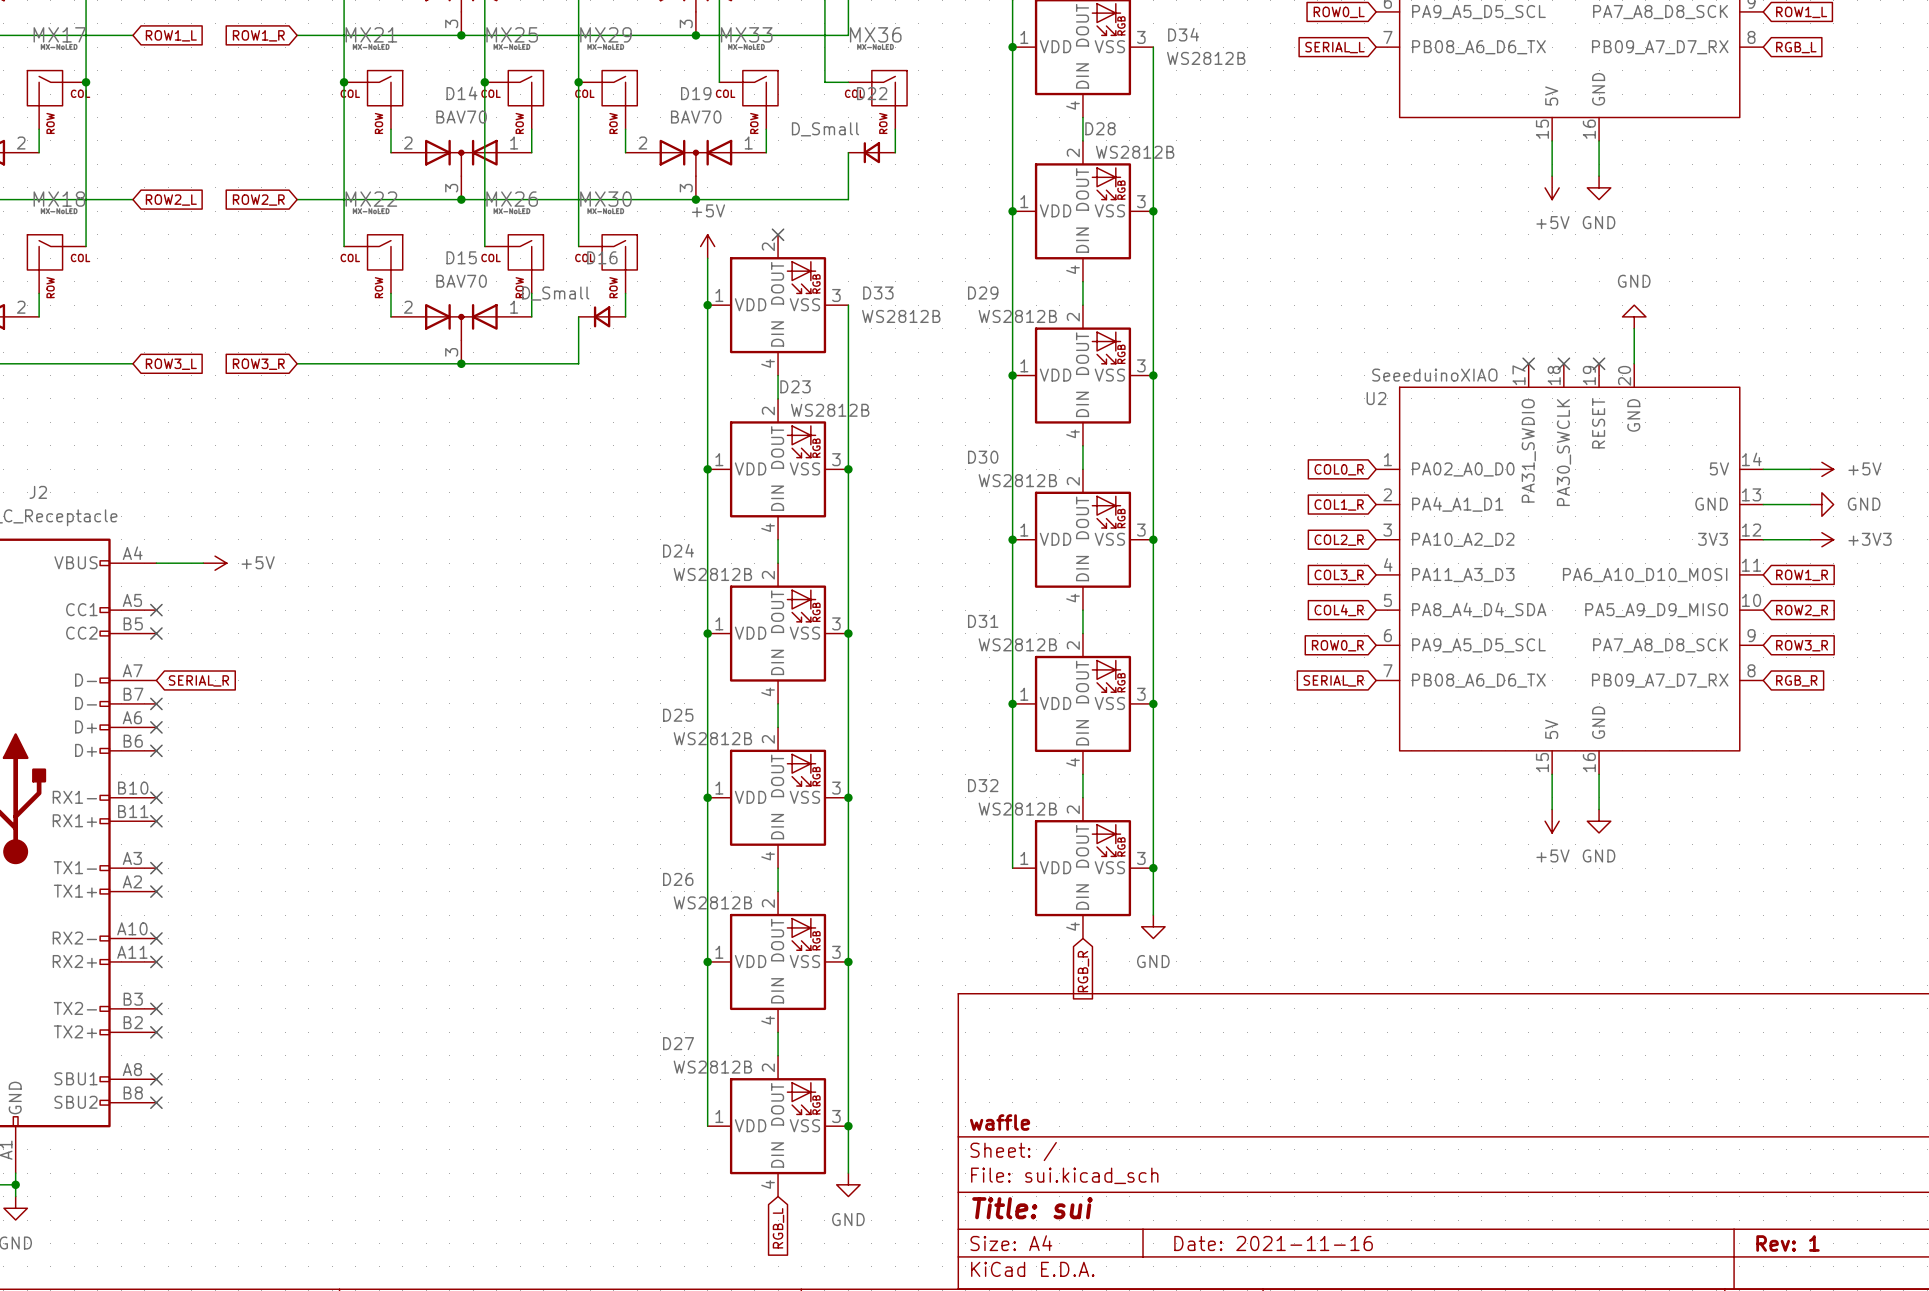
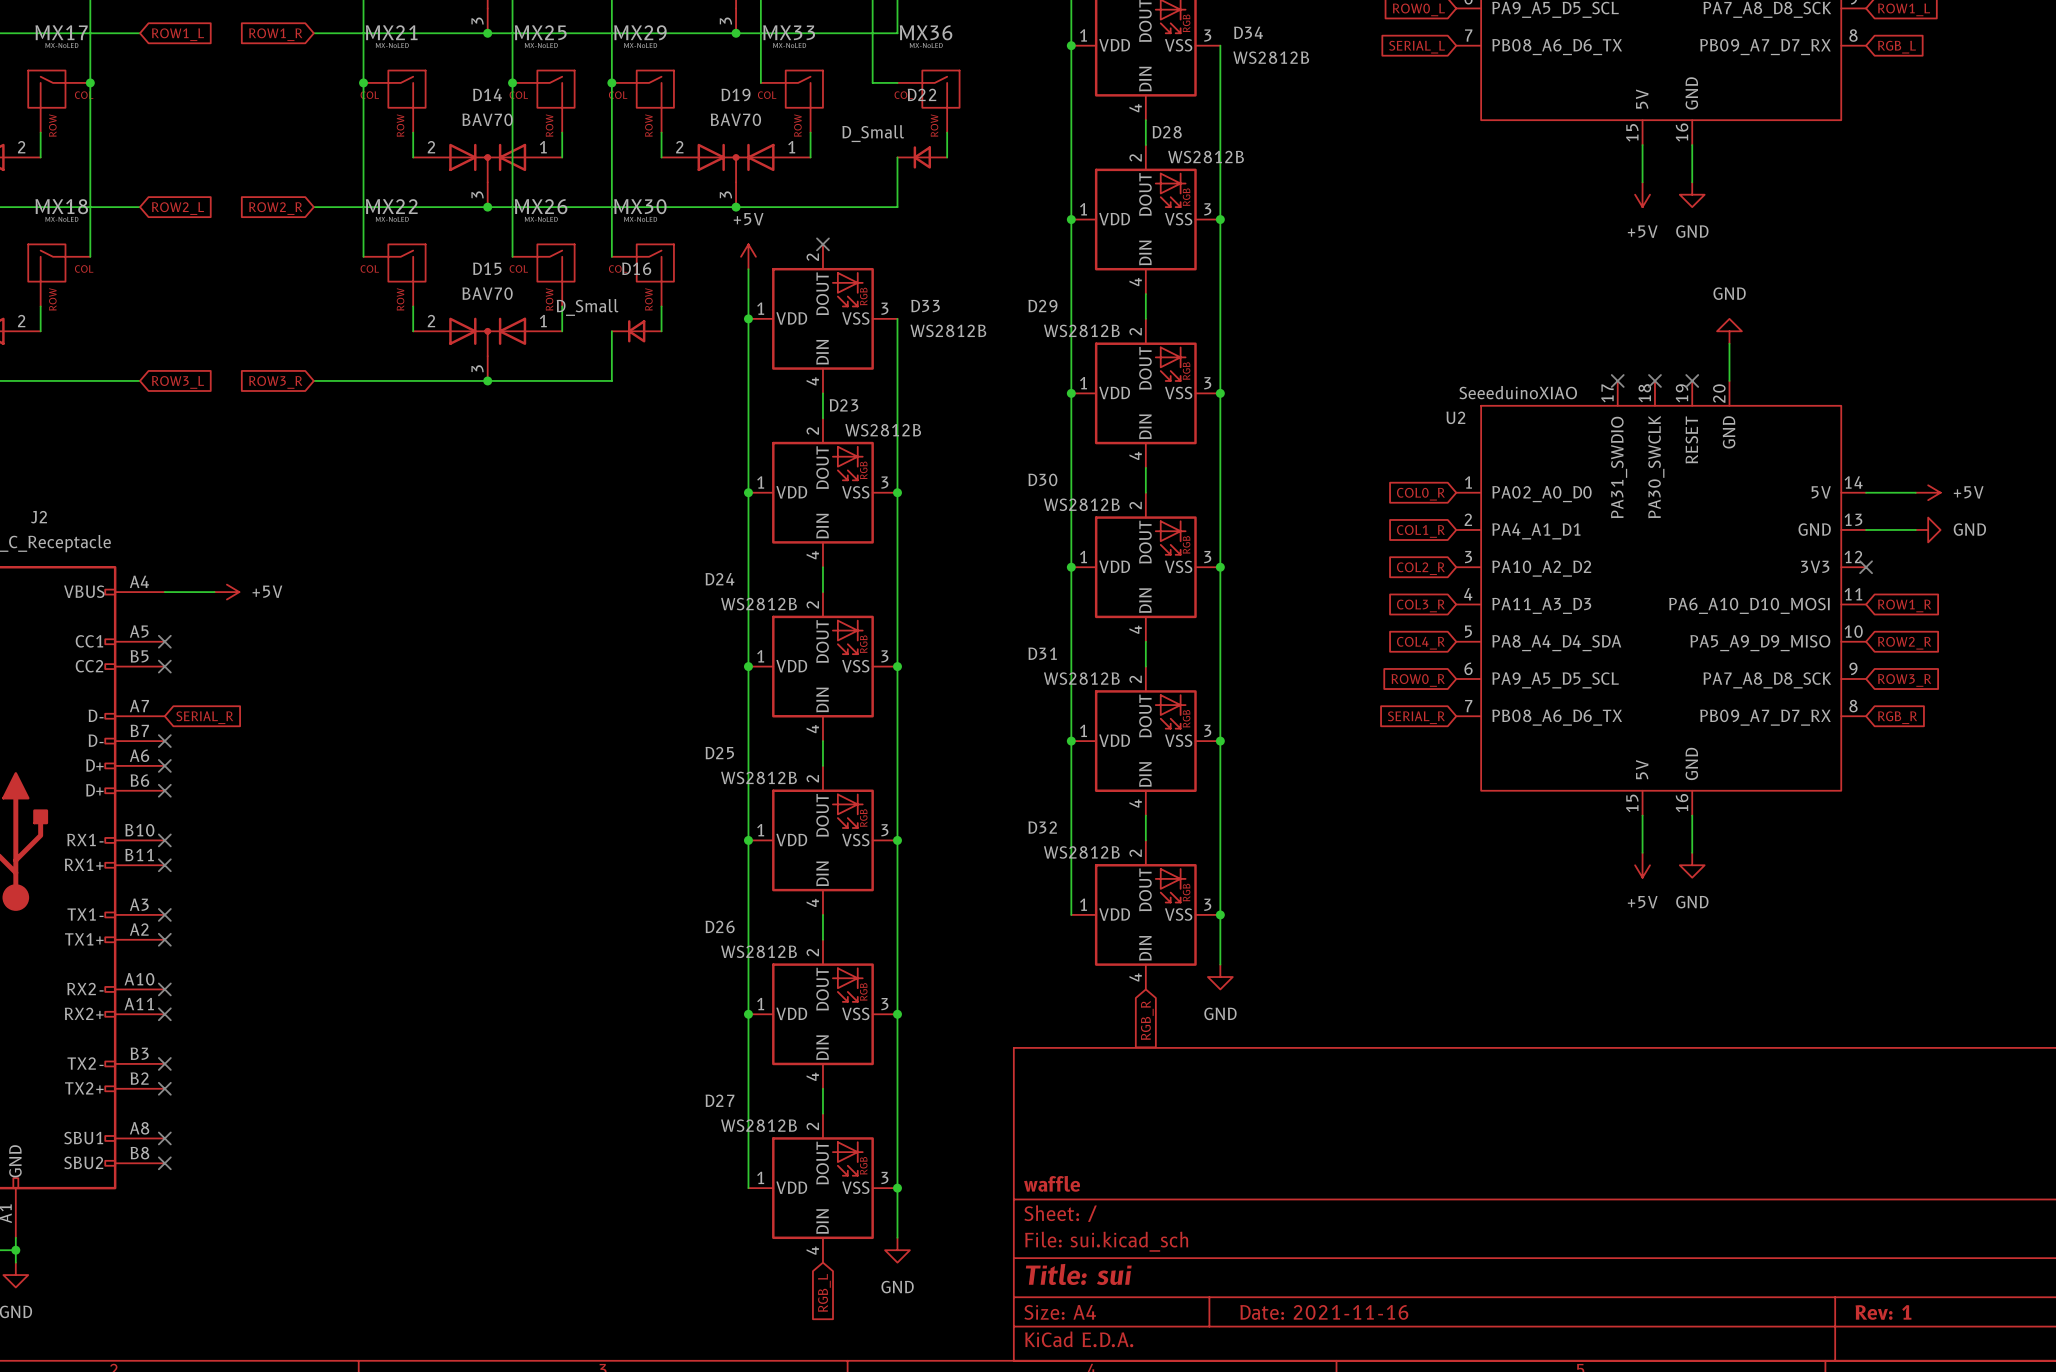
wire: (1763, 539) (1810, 539) -> none
no-connect mark: none -> (1866, 567)
power symbol: +3V3 (1821, 539) -> none

